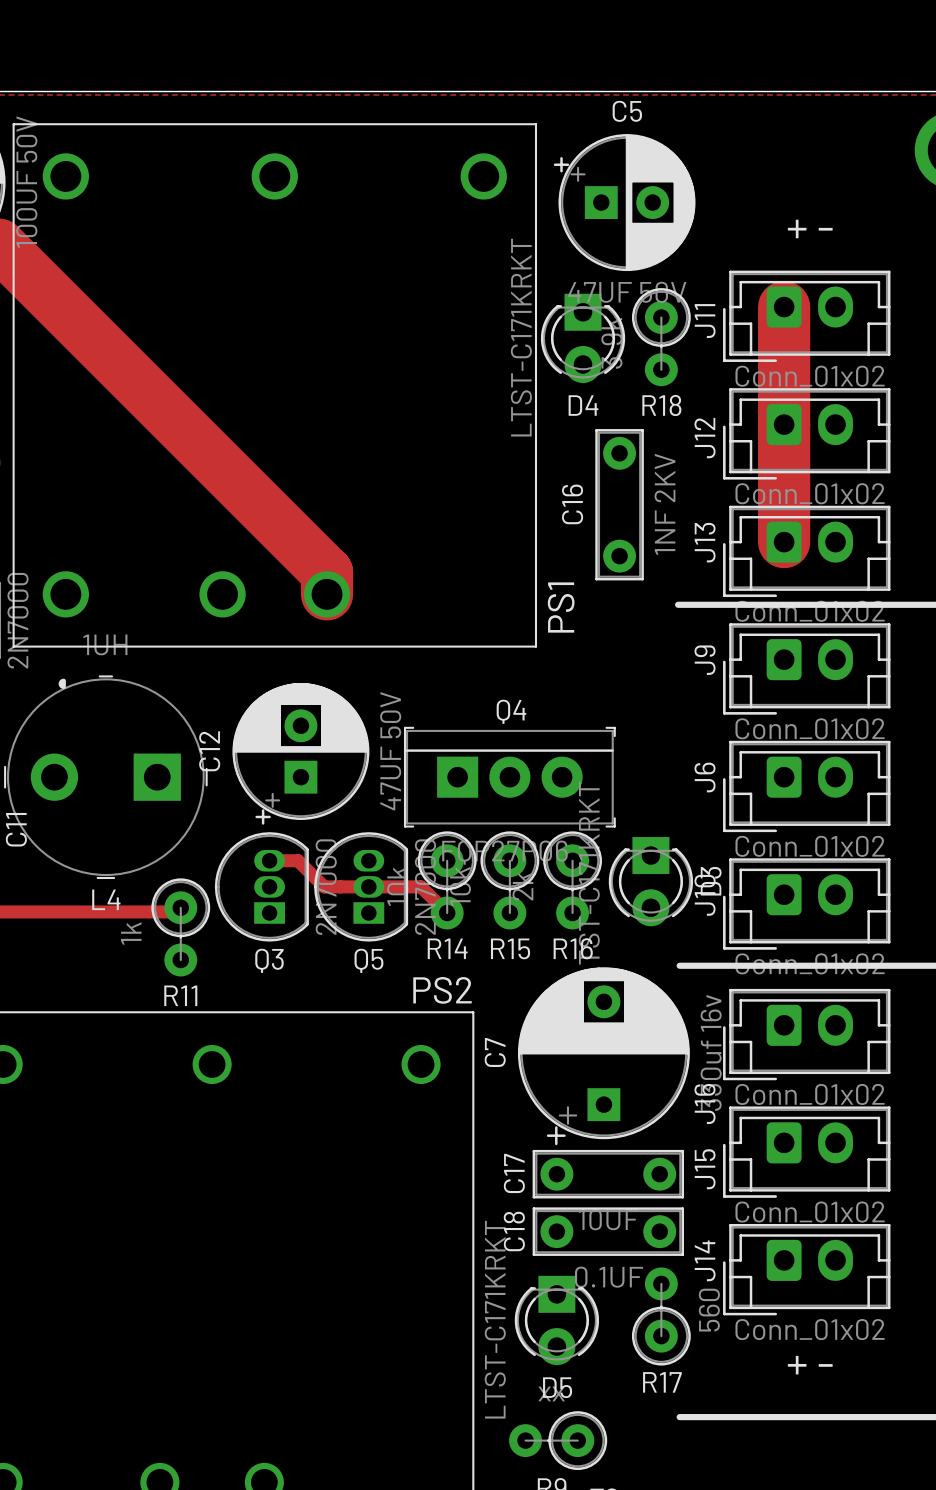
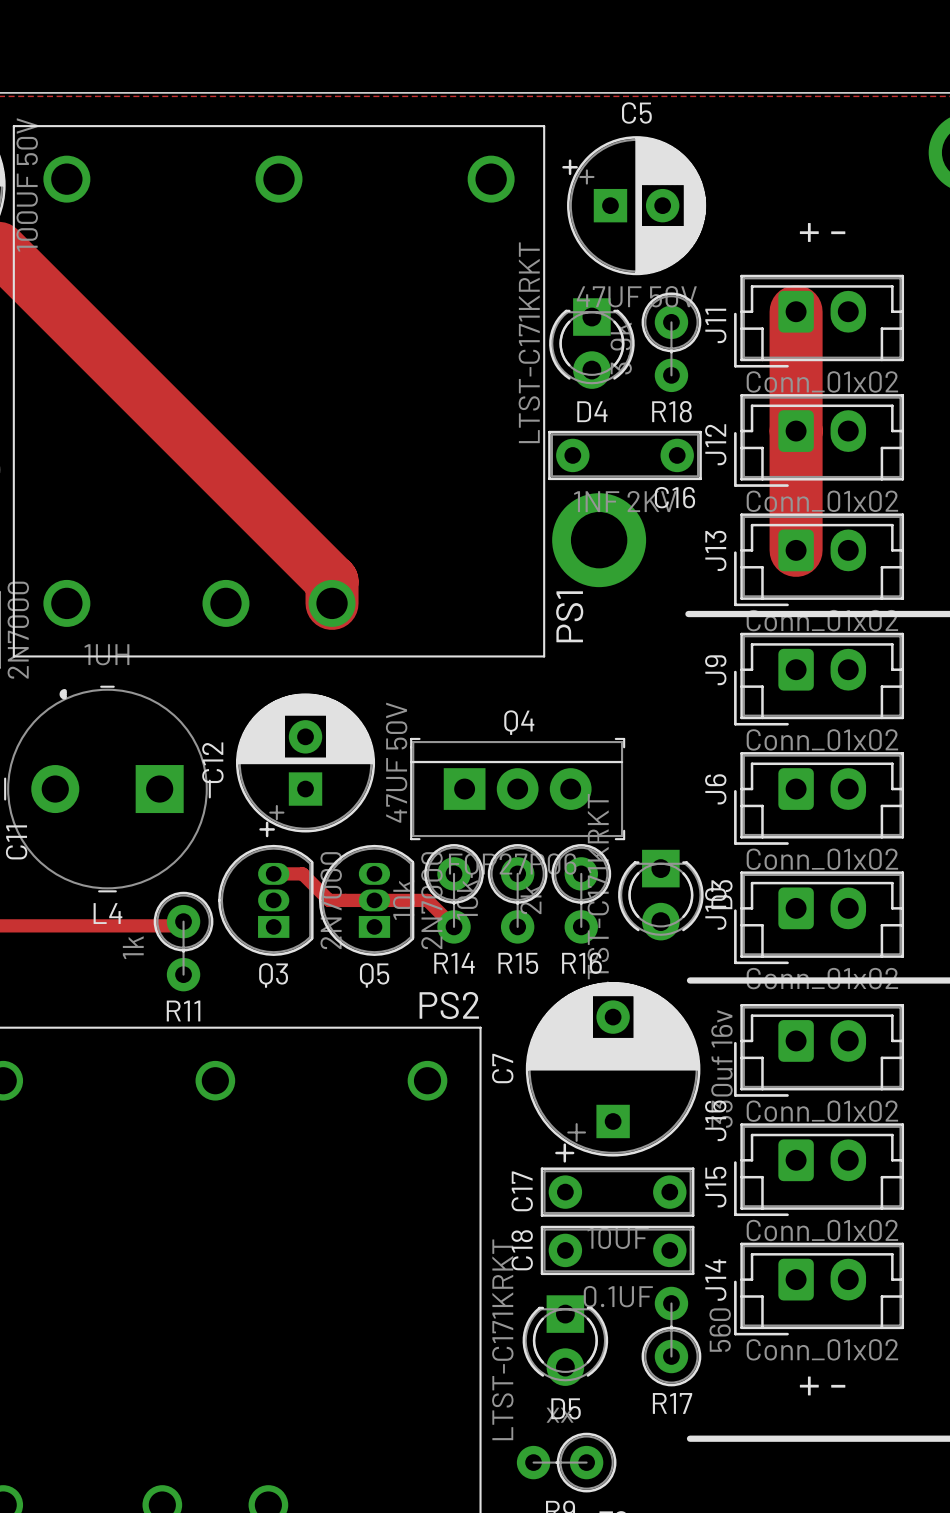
C16 name position: C16 (572, 504) -> C16 (674, 497)
C16 rotation: 0° (619, 504) -> 90° clockwise (625, 455)
via: none -> (599, 540)

